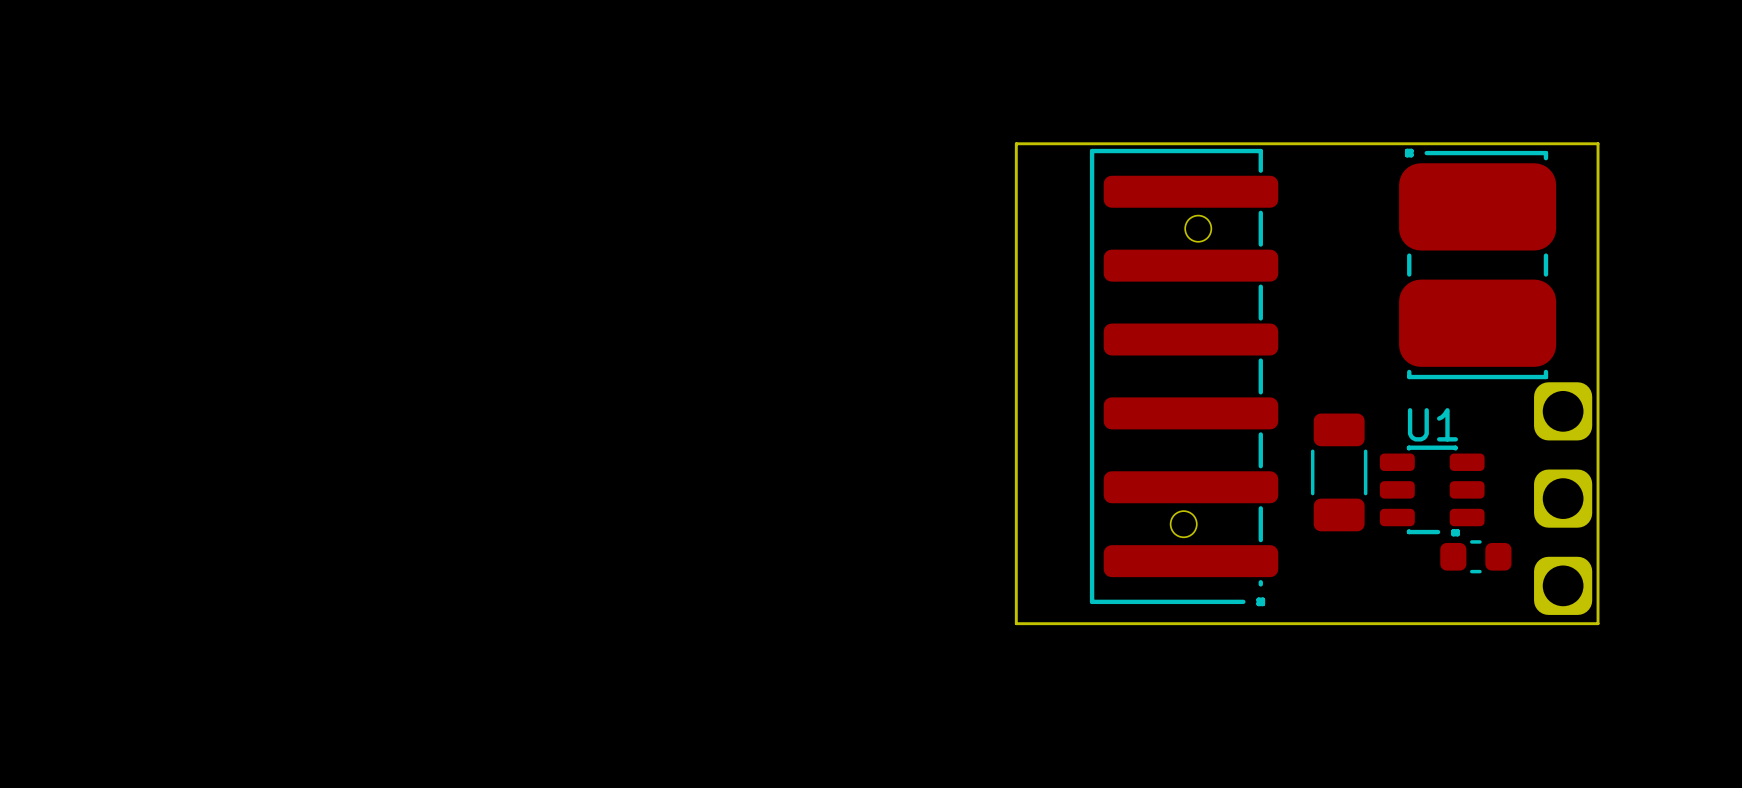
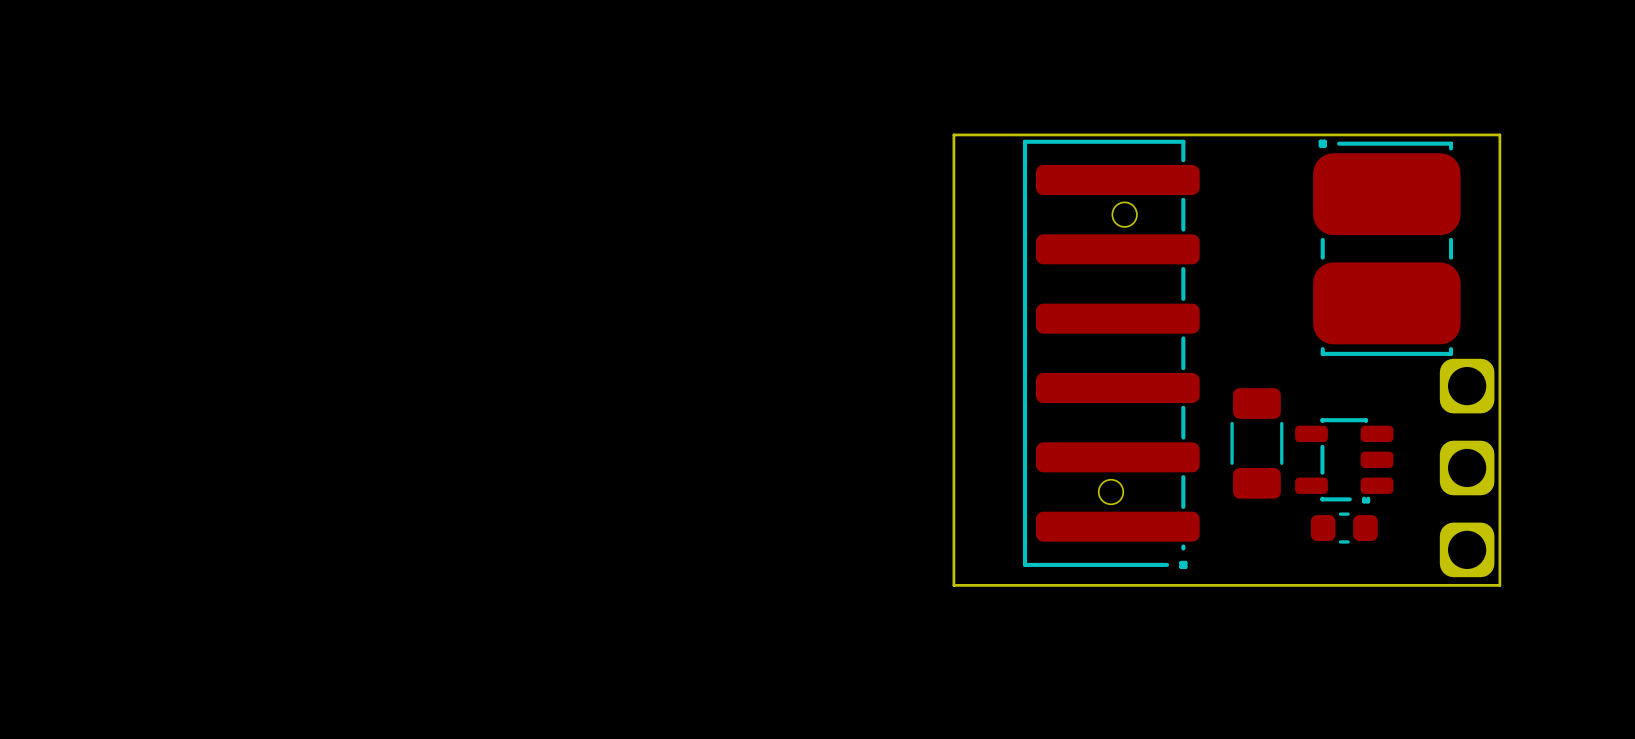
U1: (1432, 490) -> none
part: none -> (1344, 460)
part position: (1475, 556) -> (1344, 528)

